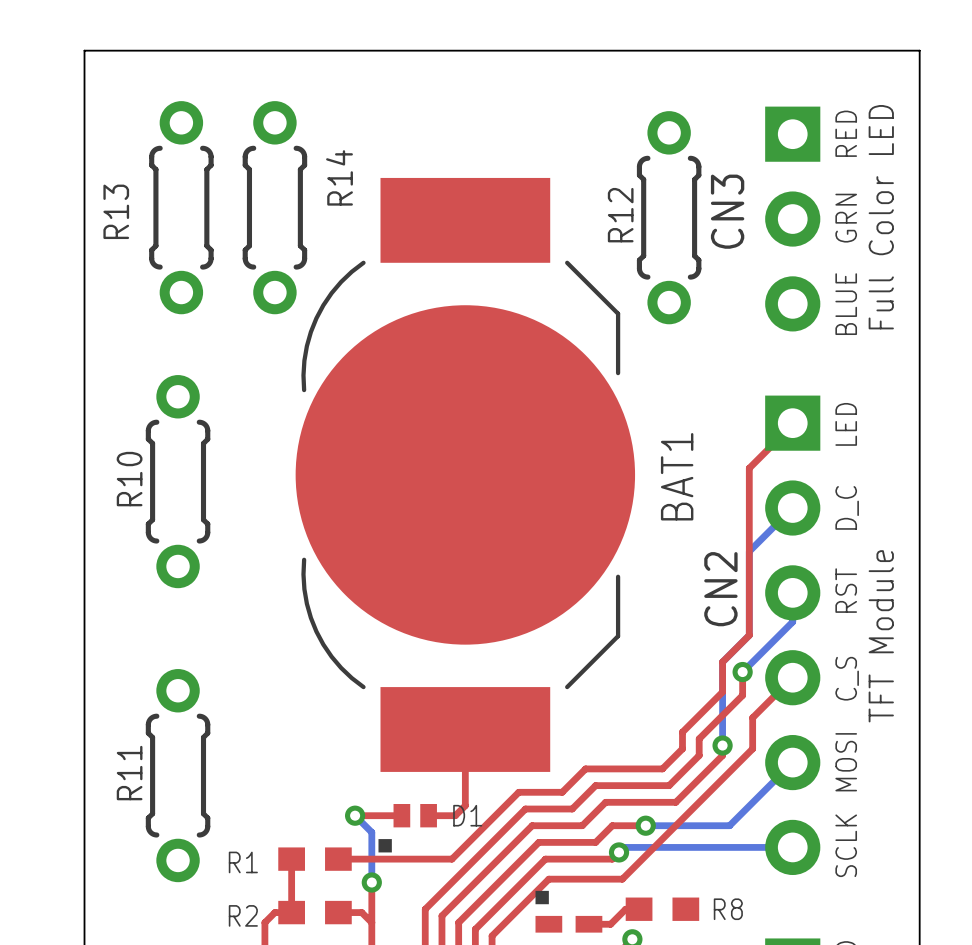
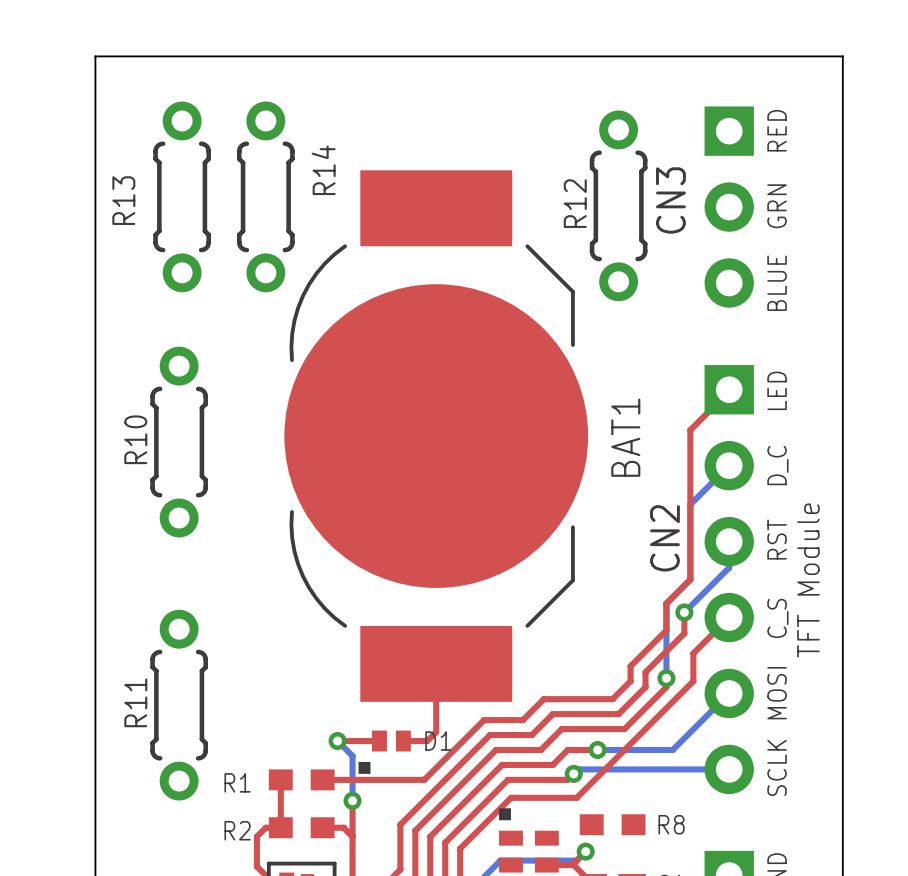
text: Full Color LED (881, 217) -> none
top track: (639, 909) (625, 909) (610, 924) (588, 924) -> none

